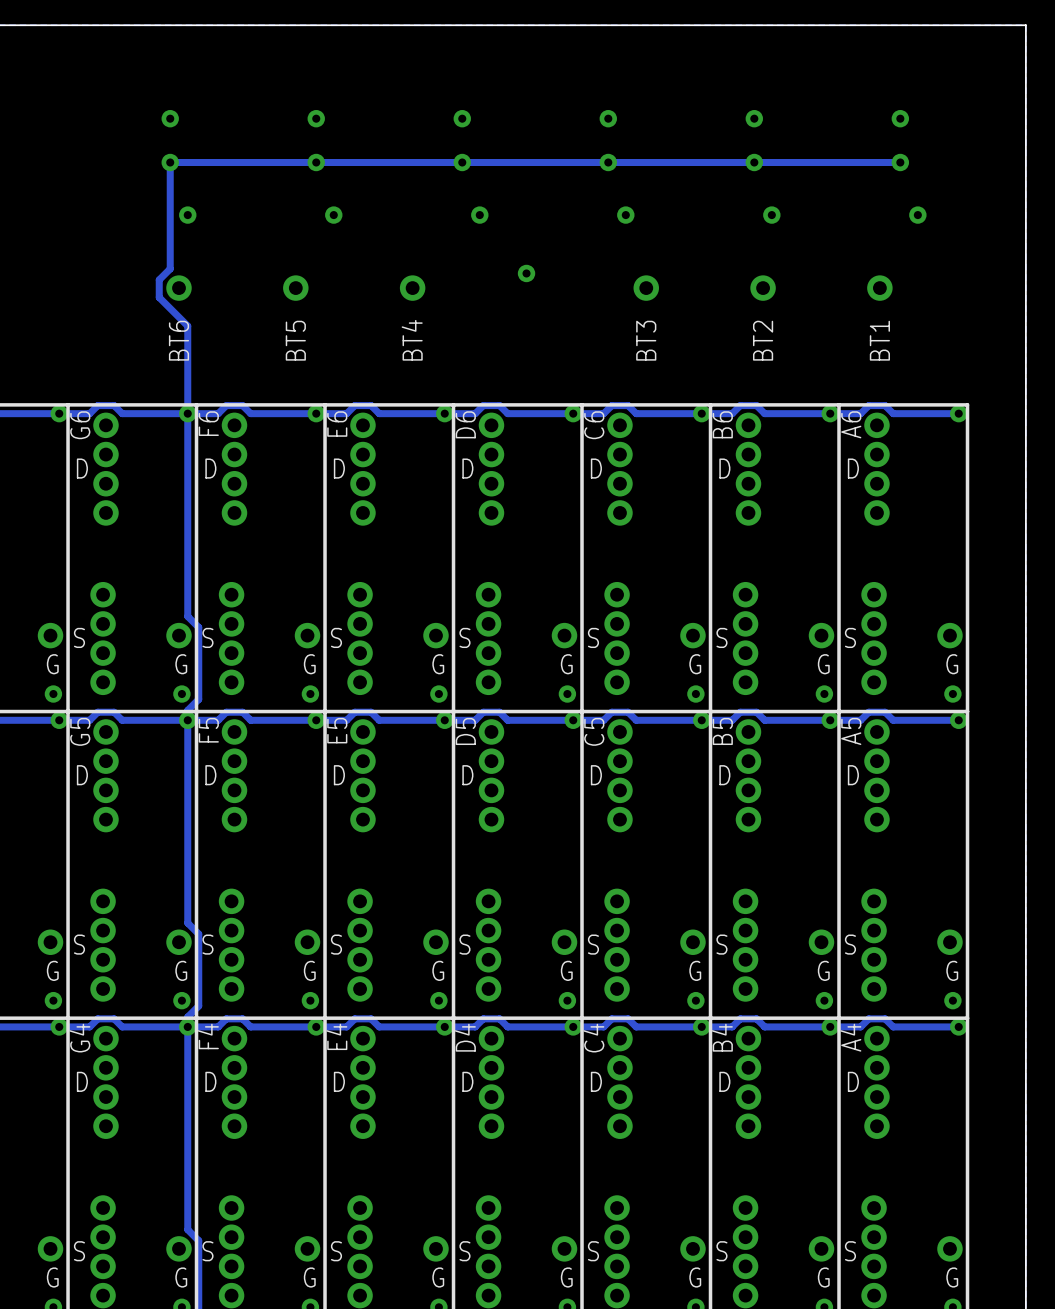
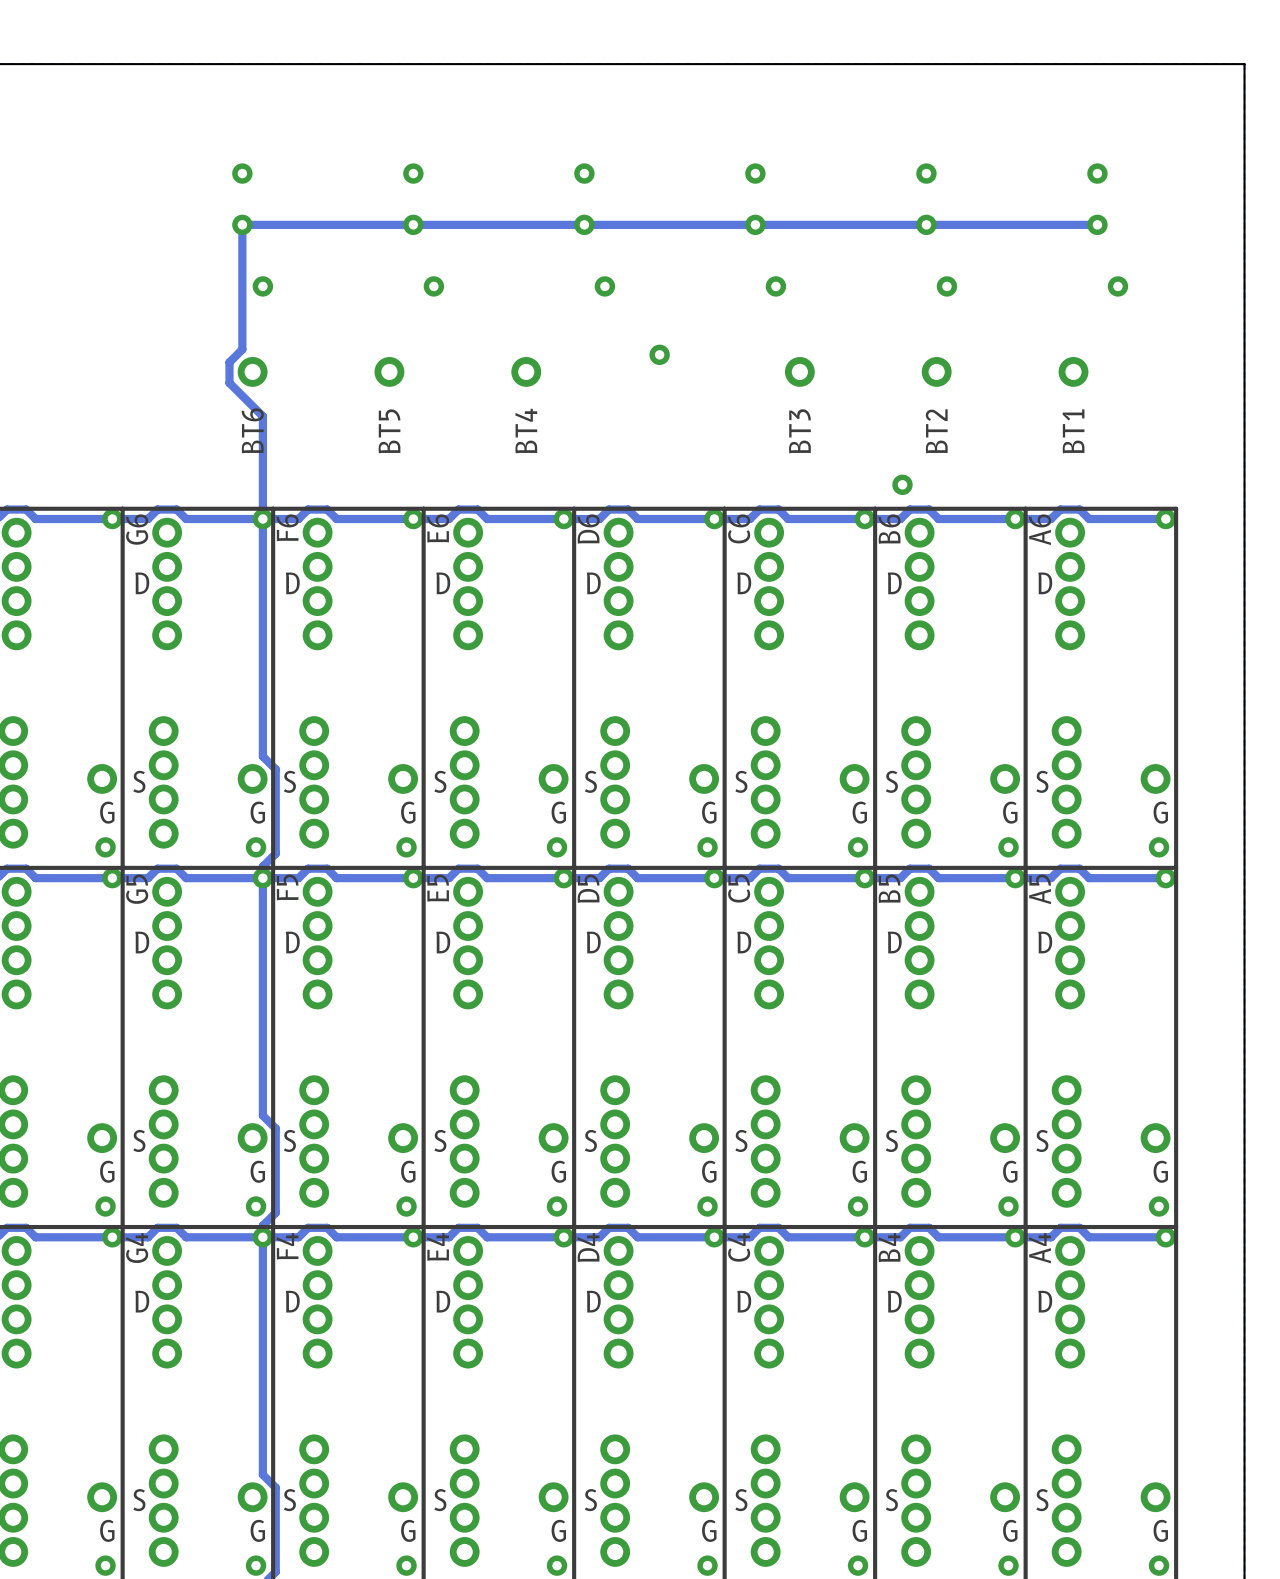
via: none -> (902, 484)

